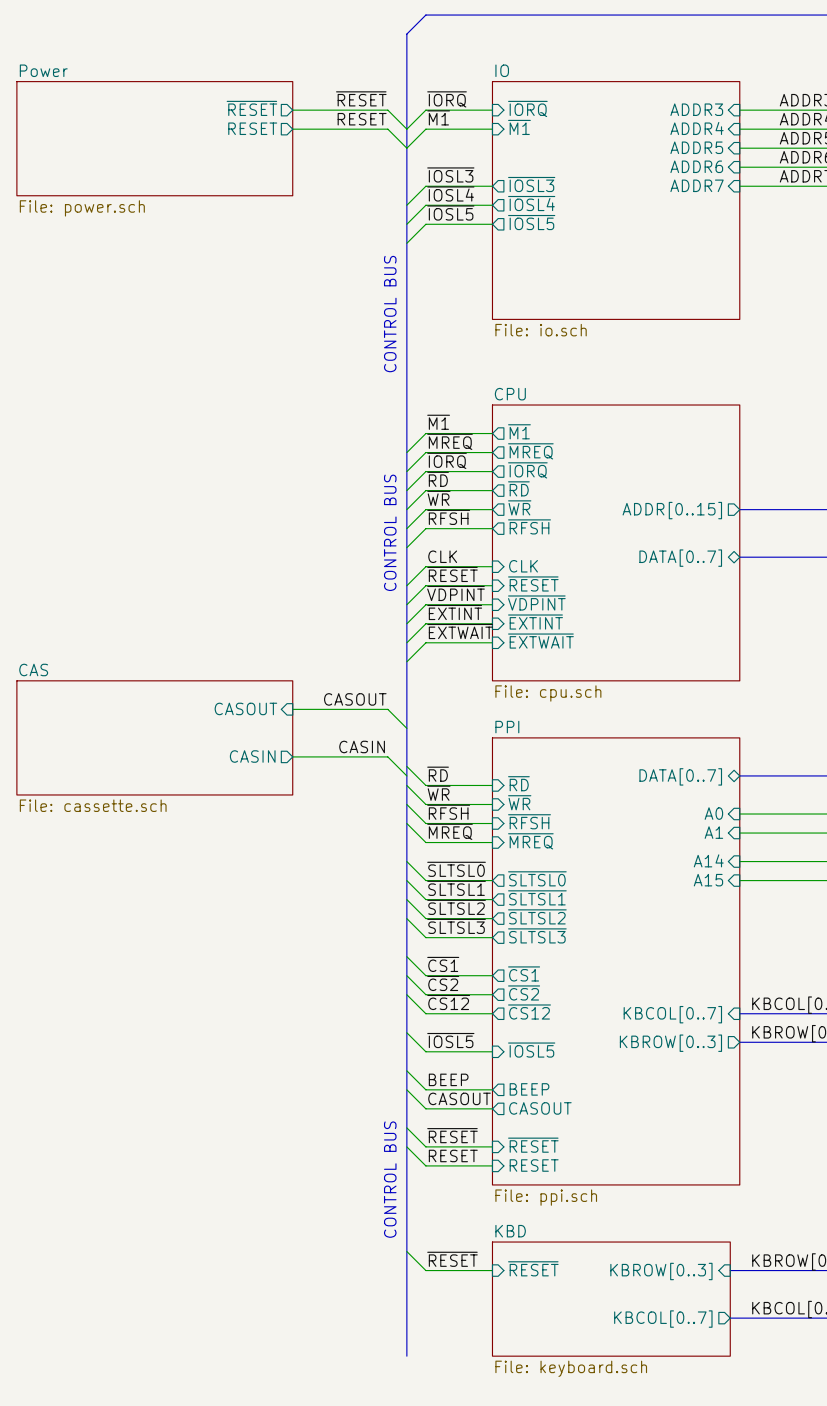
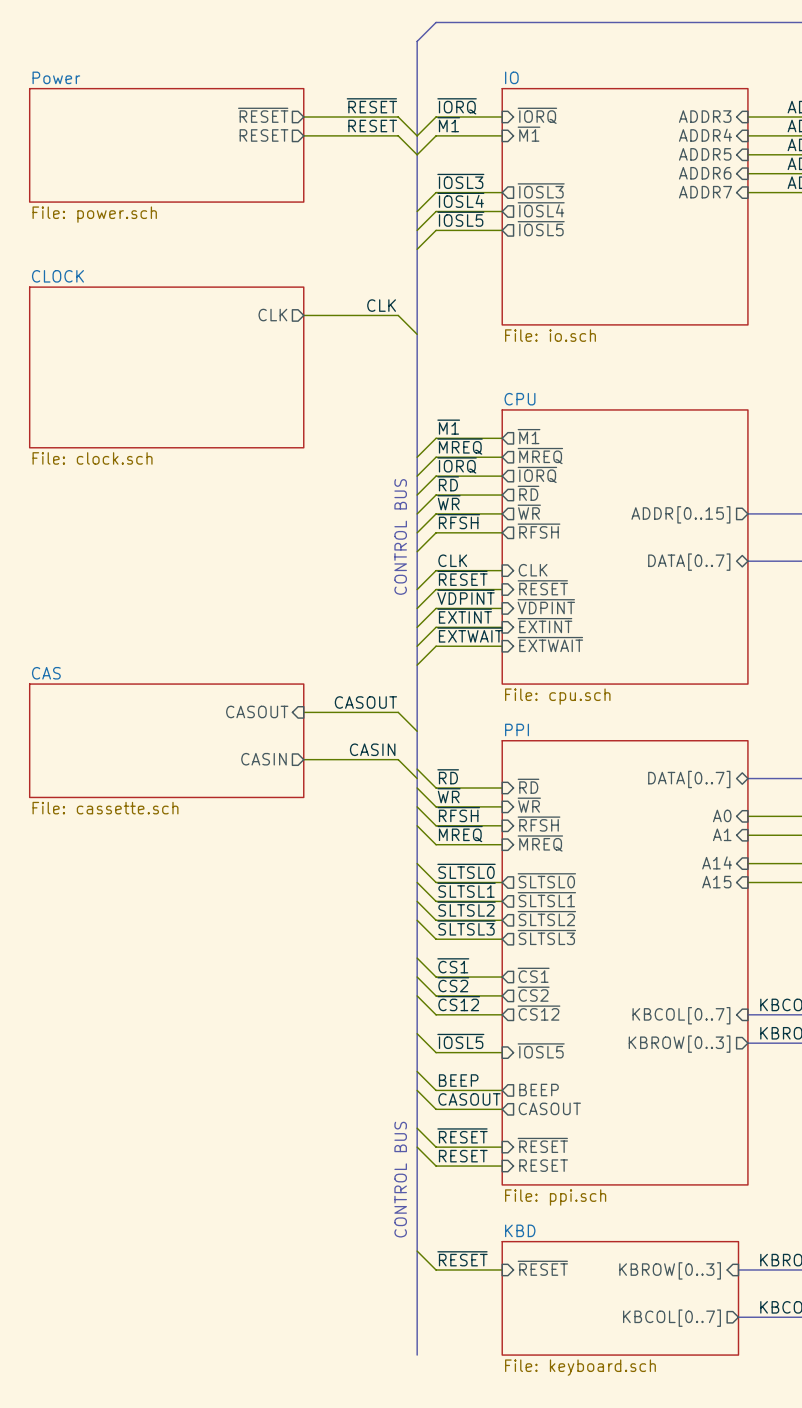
label: none -> CLK (381, 305)
sheet pin: none -> CLK (272, 315)
wire: none -> (303, 315) (398, 315) (417, 334)
text: CONTROL BUS (390, 314) -> none
sheet CLOCK: none -> File: clock.sch (166, 367)

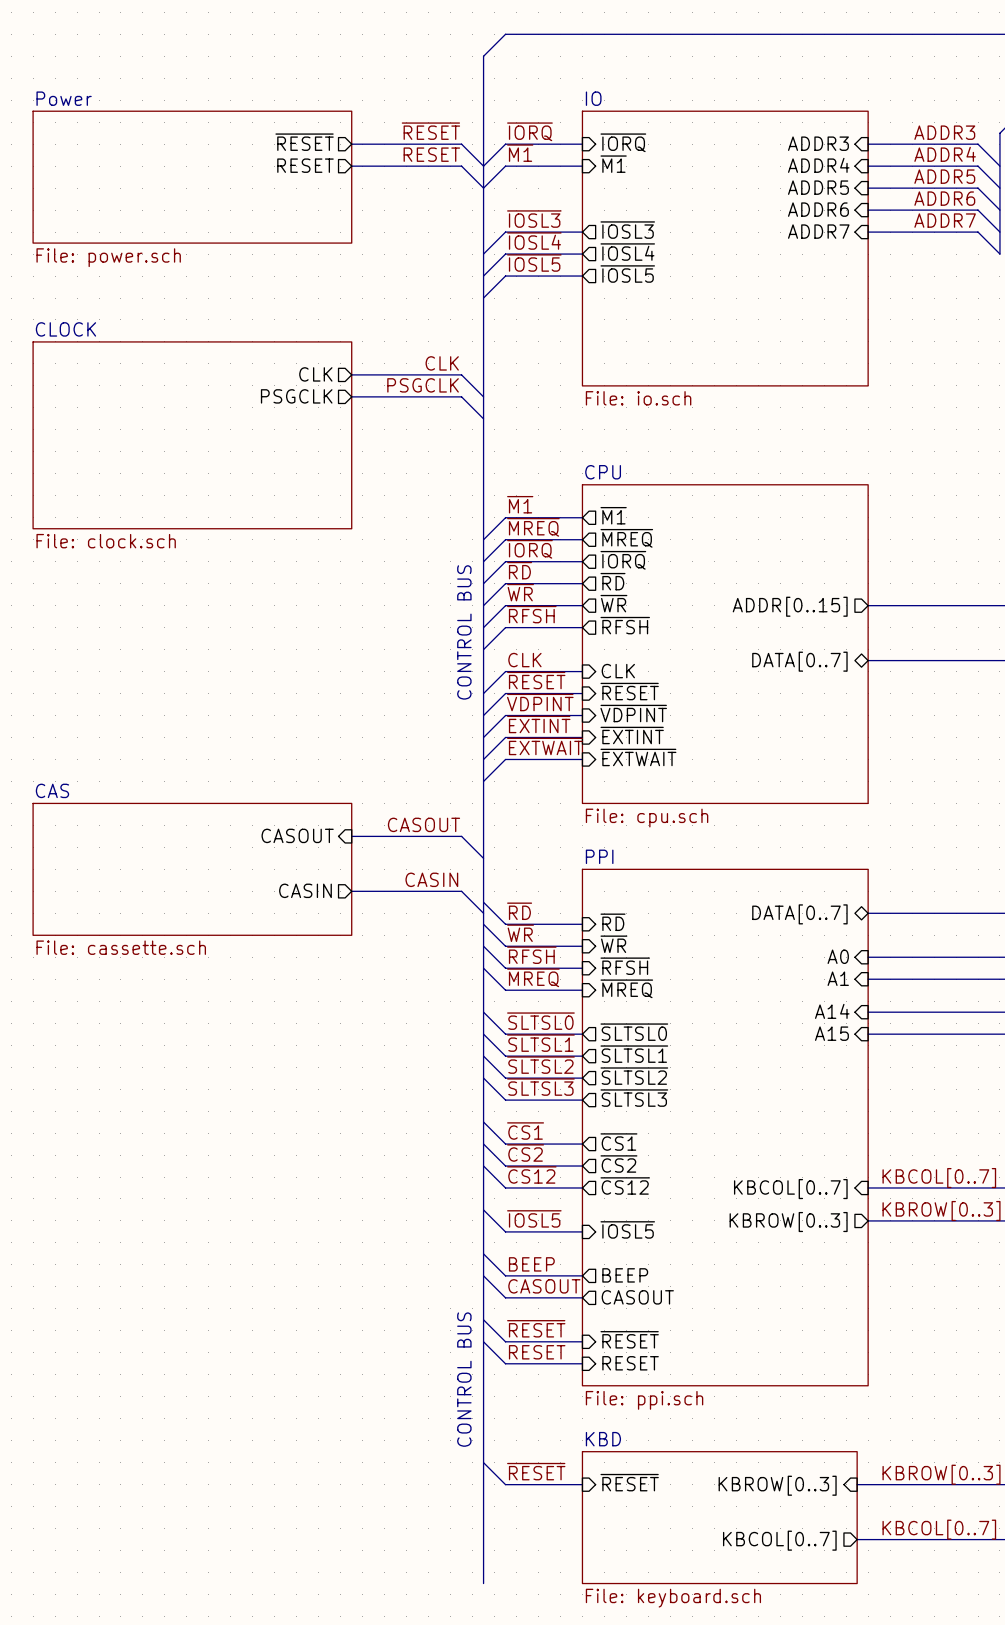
label: none -> PSGCLK (423, 385)
sheet pin: none -> PSGCLK (296, 396)
wire: none -> (351, 396) (461, 396) (483, 418)

